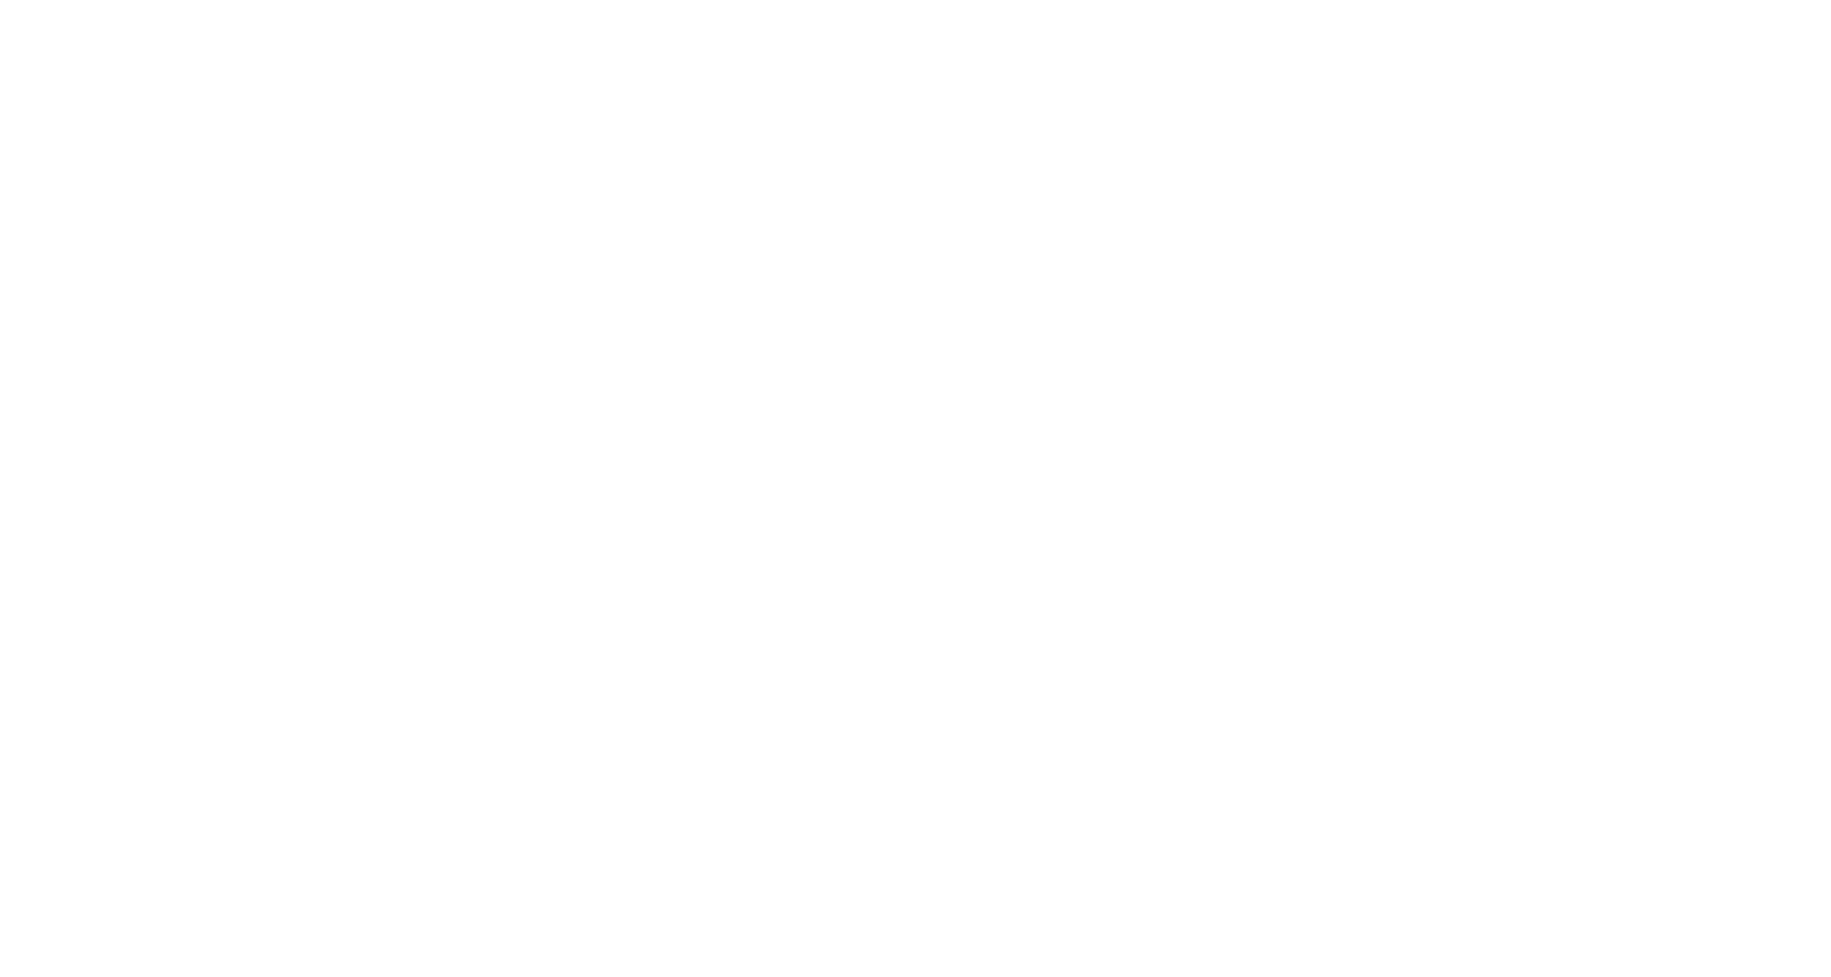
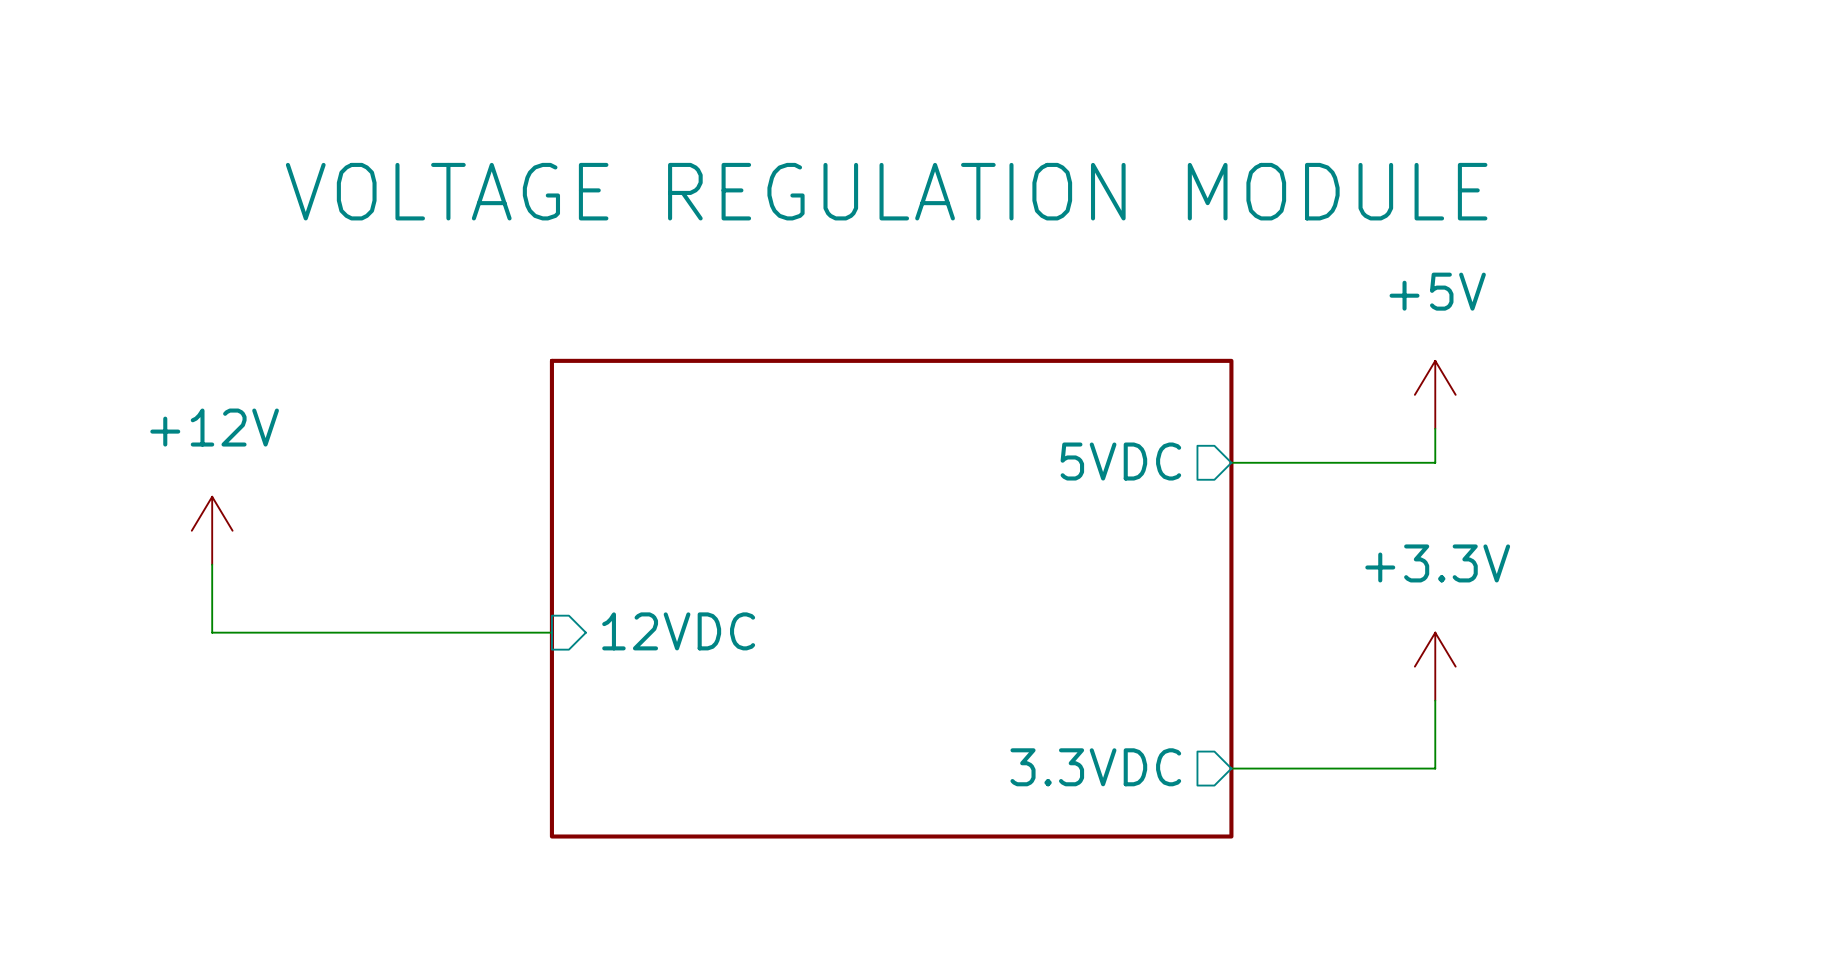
power symbol: none -> +5V (1435, 394)
wire: none -> (1435, 428) (1435, 462) (1231, 462)
sheet pin: none -> 5VDC (1120, 461)
power symbol: none -> +12V (212, 530)
wire: none -> (212, 564) (212, 632) (551, 632)
sheet VOLTAGE REGULATION MODULE: none -> (891, 598)
sheet pin: none -> 12VDC (678, 631)
power symbol: none -> +3.3V (1435, 666)
wire: none -> (1435, 700) (1435, 768) (1231, 768)
sheet pin: none -> 3.3VDC (1095, 767)

